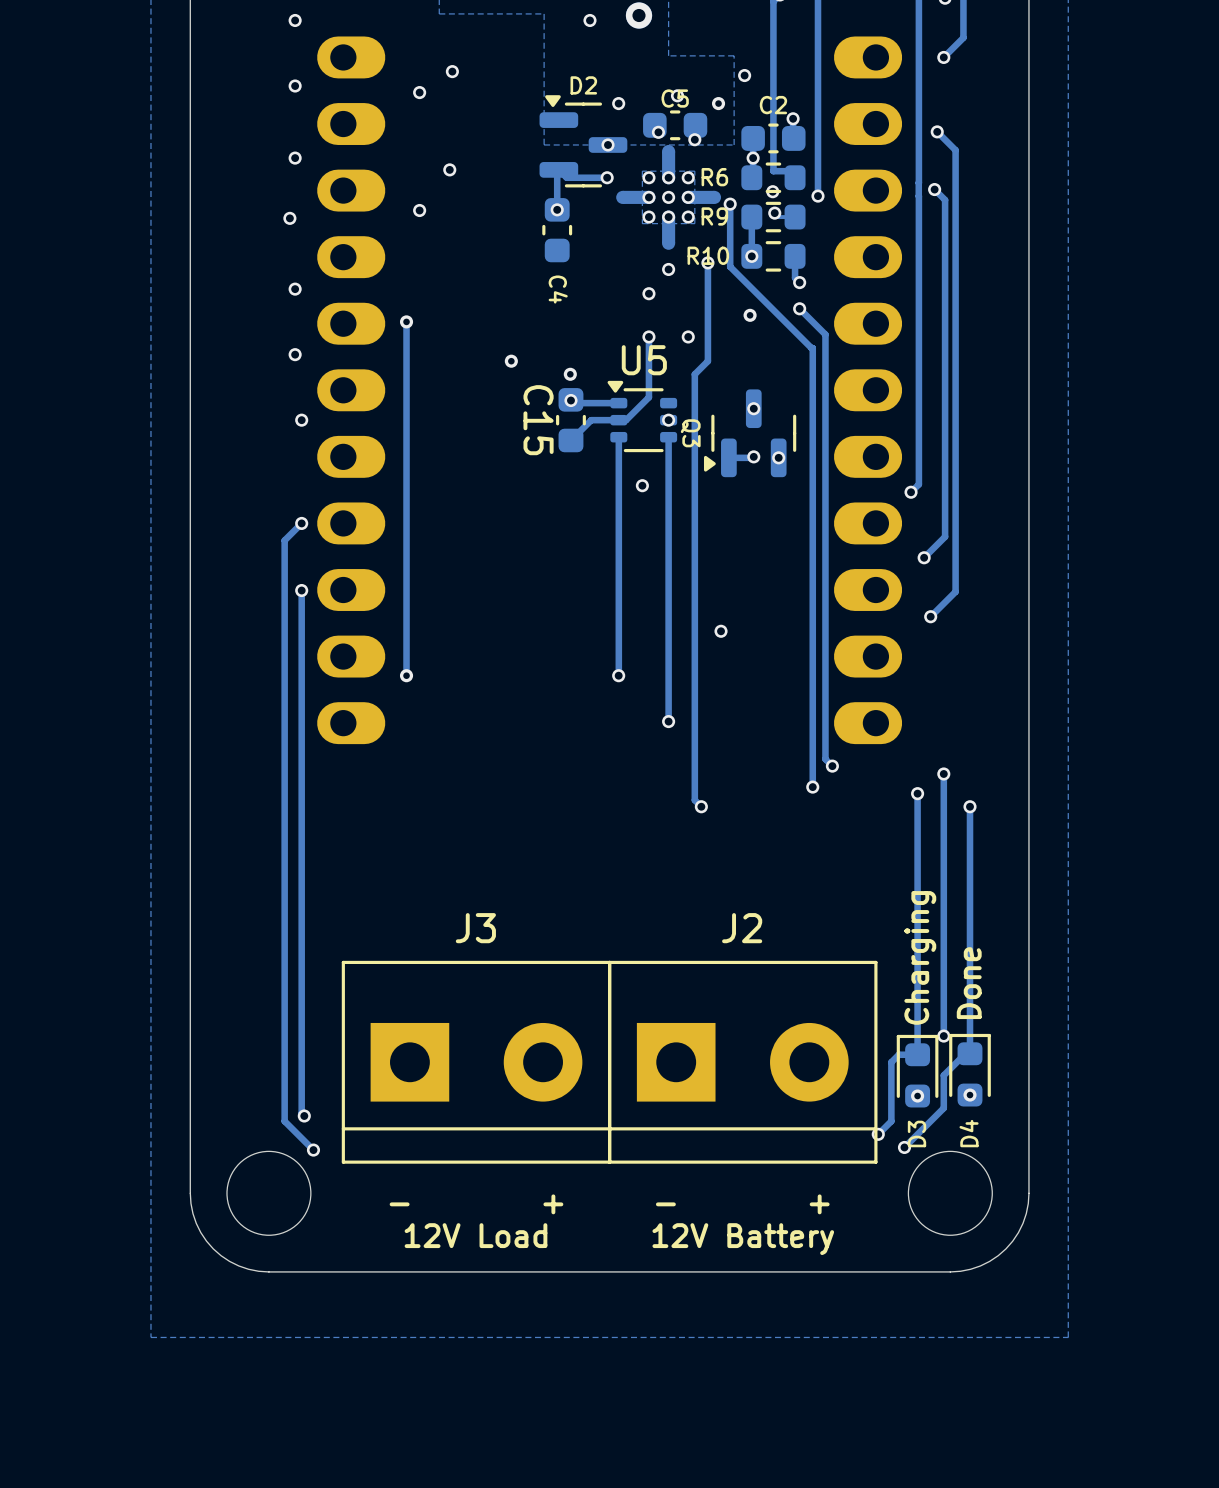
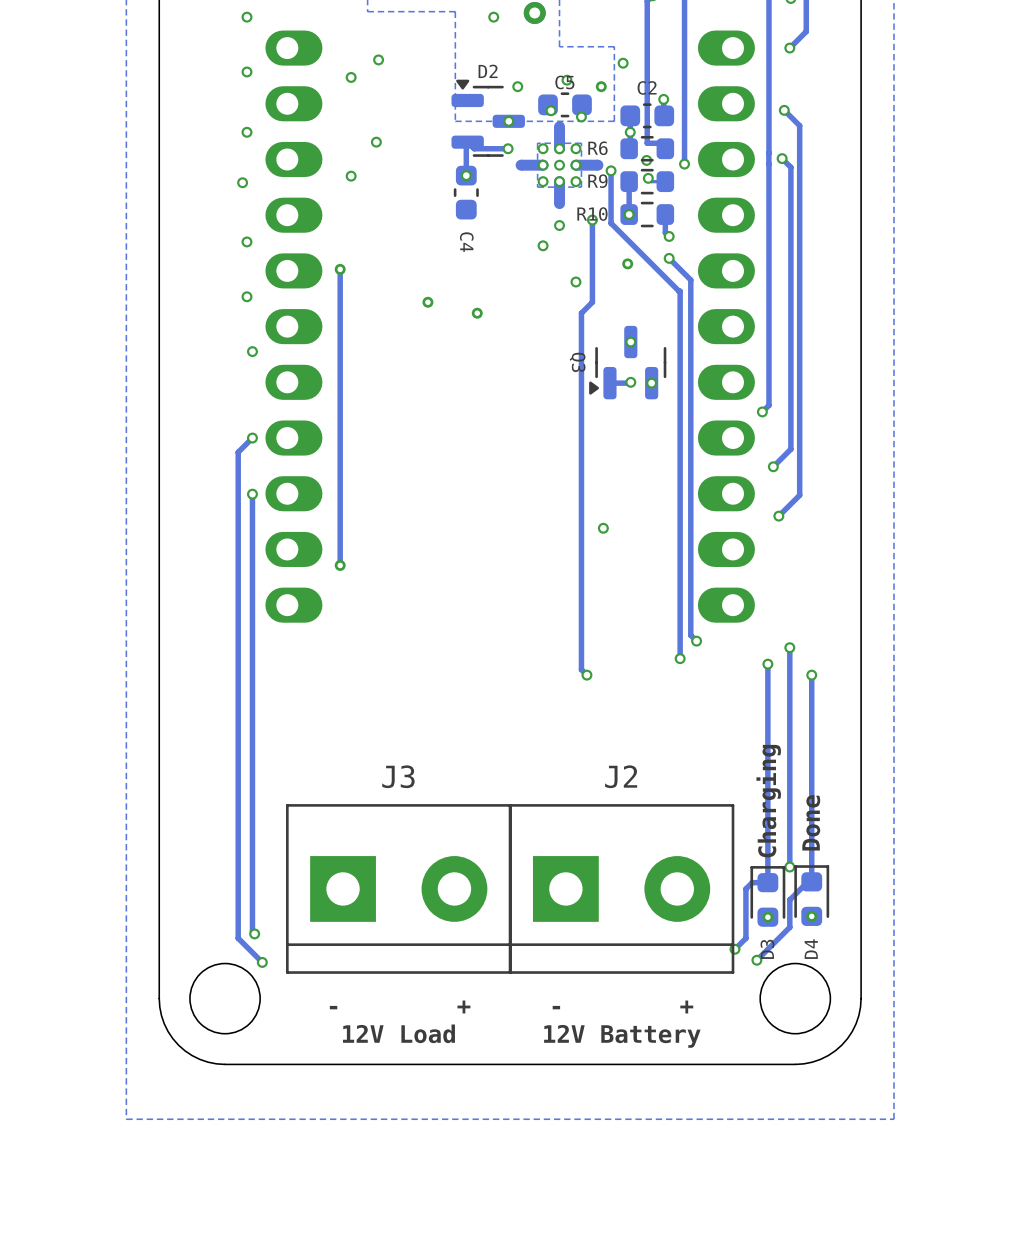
track: (648, 336) (648, 397) (626, 420) (591, 420) (570, 440) -> none
via: (648, 336) -> none
track: (570, 399) (574, 403) (618, 403) -> none
via: (570, 400) -> none
U5: (642, 416) -> none
C15: (570, 420) -> none
via: (668, 420) -> none
track: (618, 437) (618, 675) -> none
track: (668, 437) (668, 721) -> none
via: (642, 485) -> none
via: (618, 675) -> none
via: (668, 721) -> none

